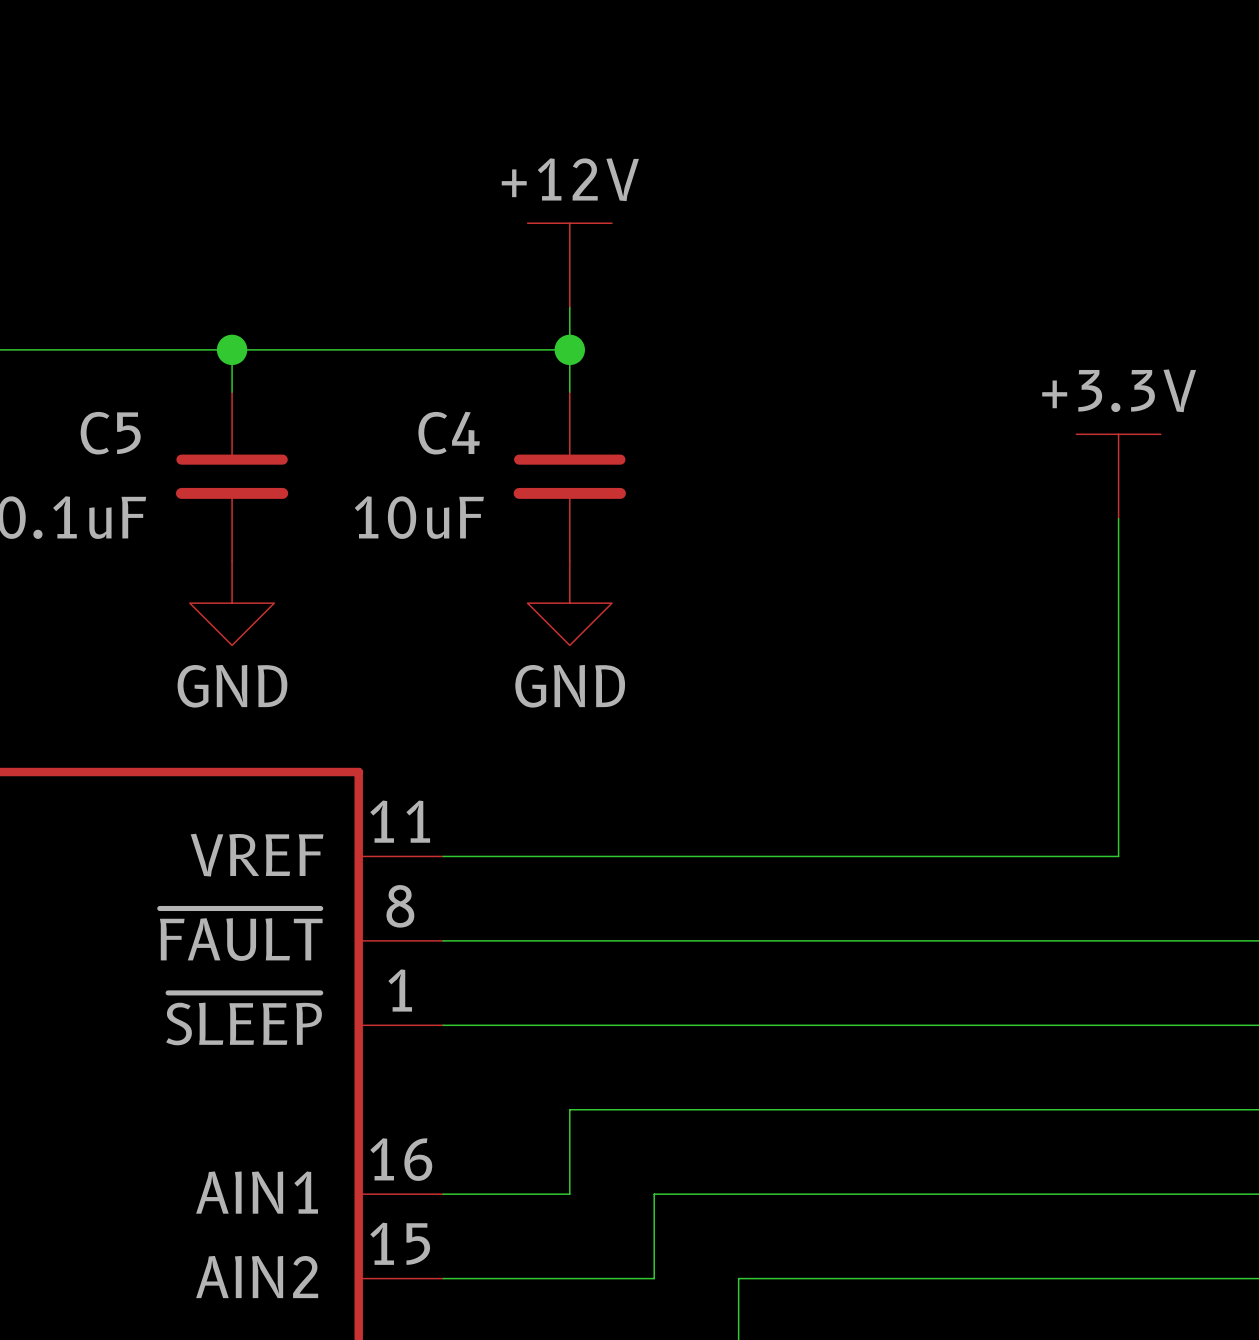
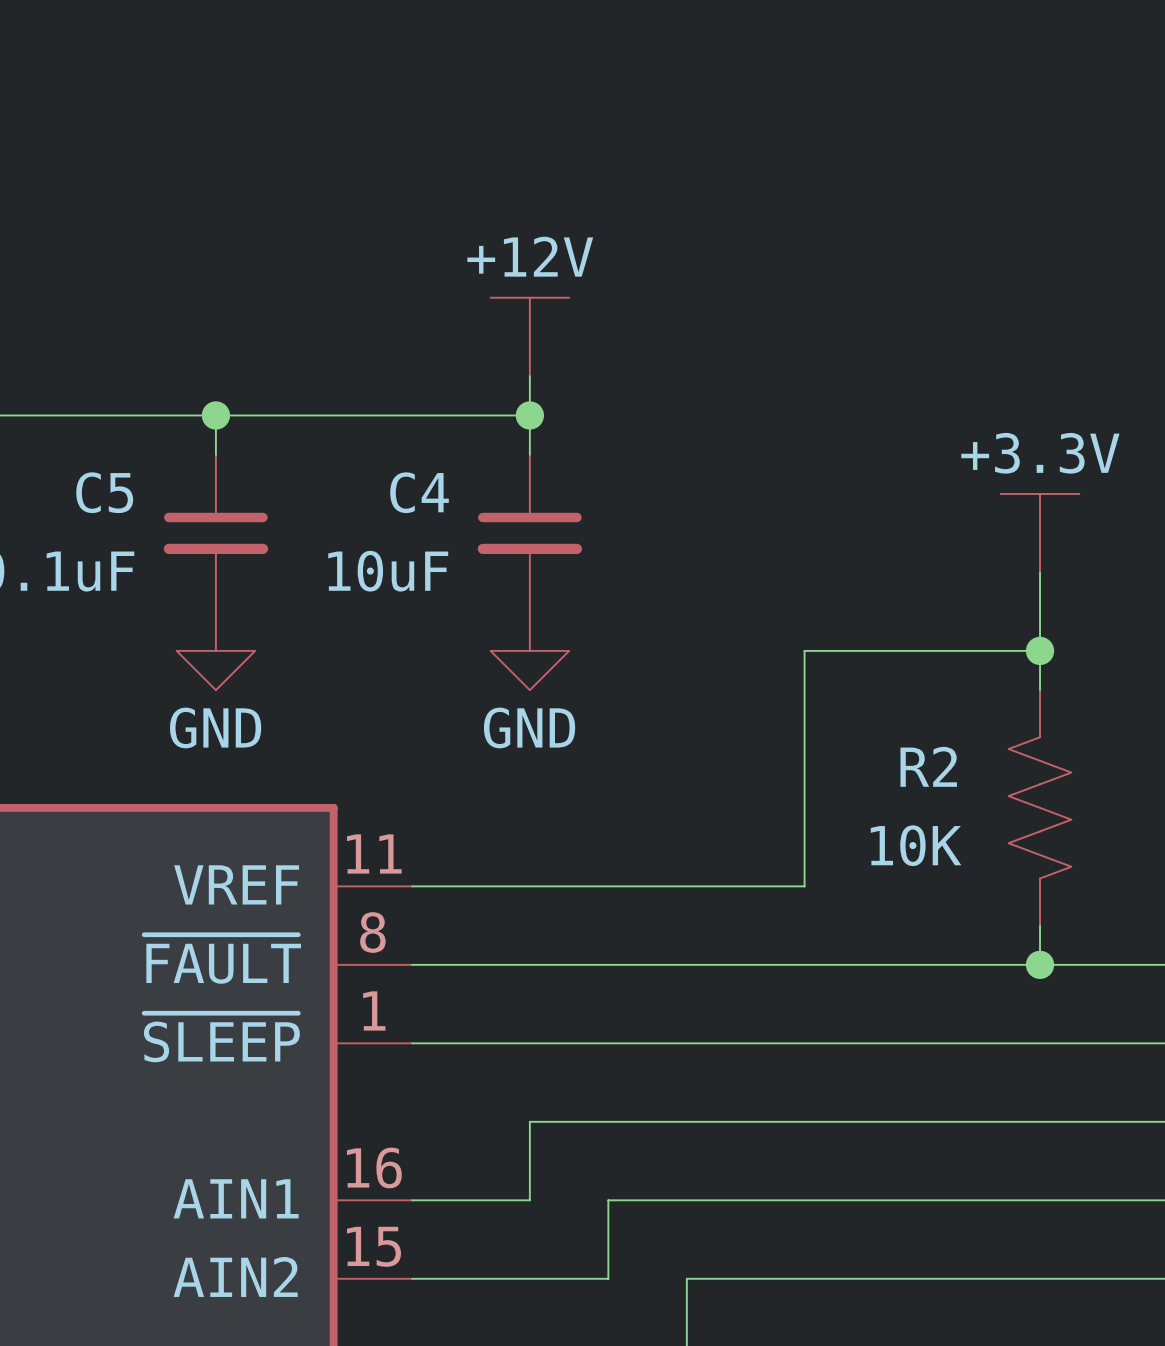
junction: none -> (1040, 650)
wire: (1118, 645) (1118, 856) (865, 856) -> (1040, 650) (804, 650) (804, 886)
R2: none -> 10K (1040, 807)
wire: none -> (1040, 925) (1040, 964)
junction: none -> (1040, 964)

